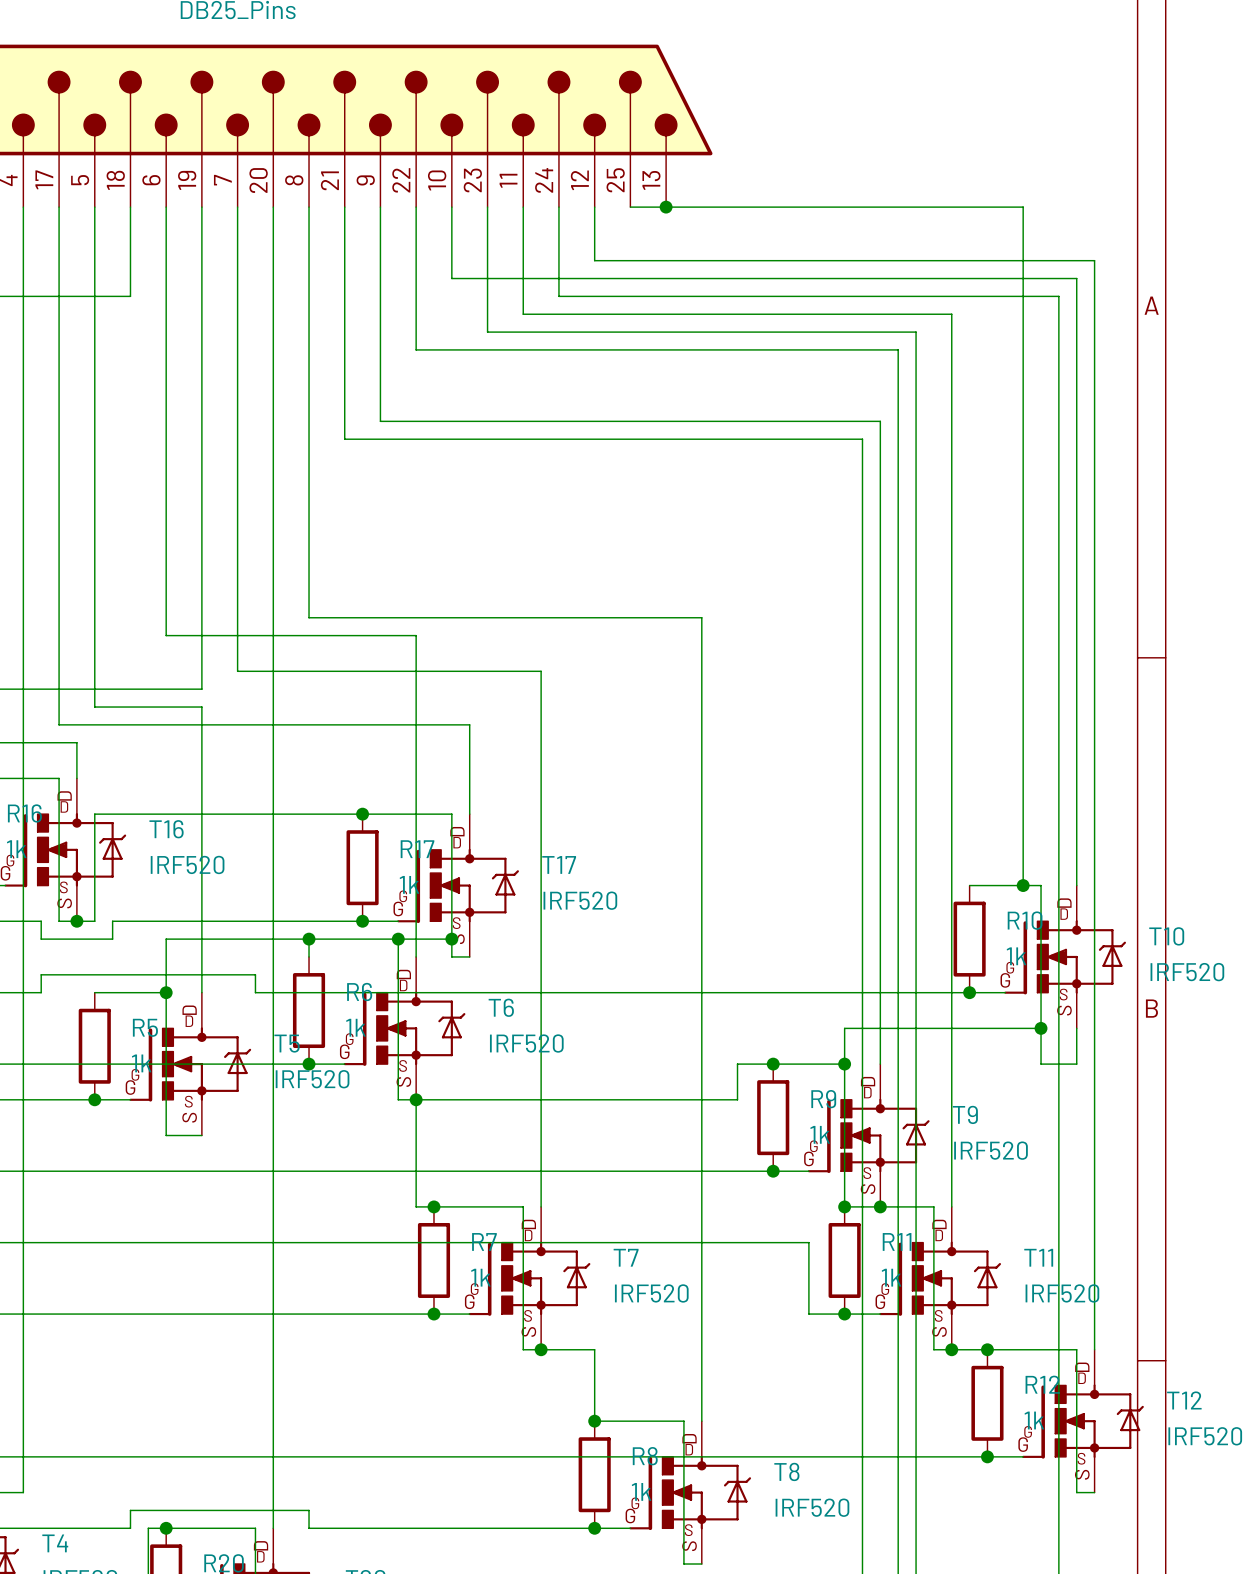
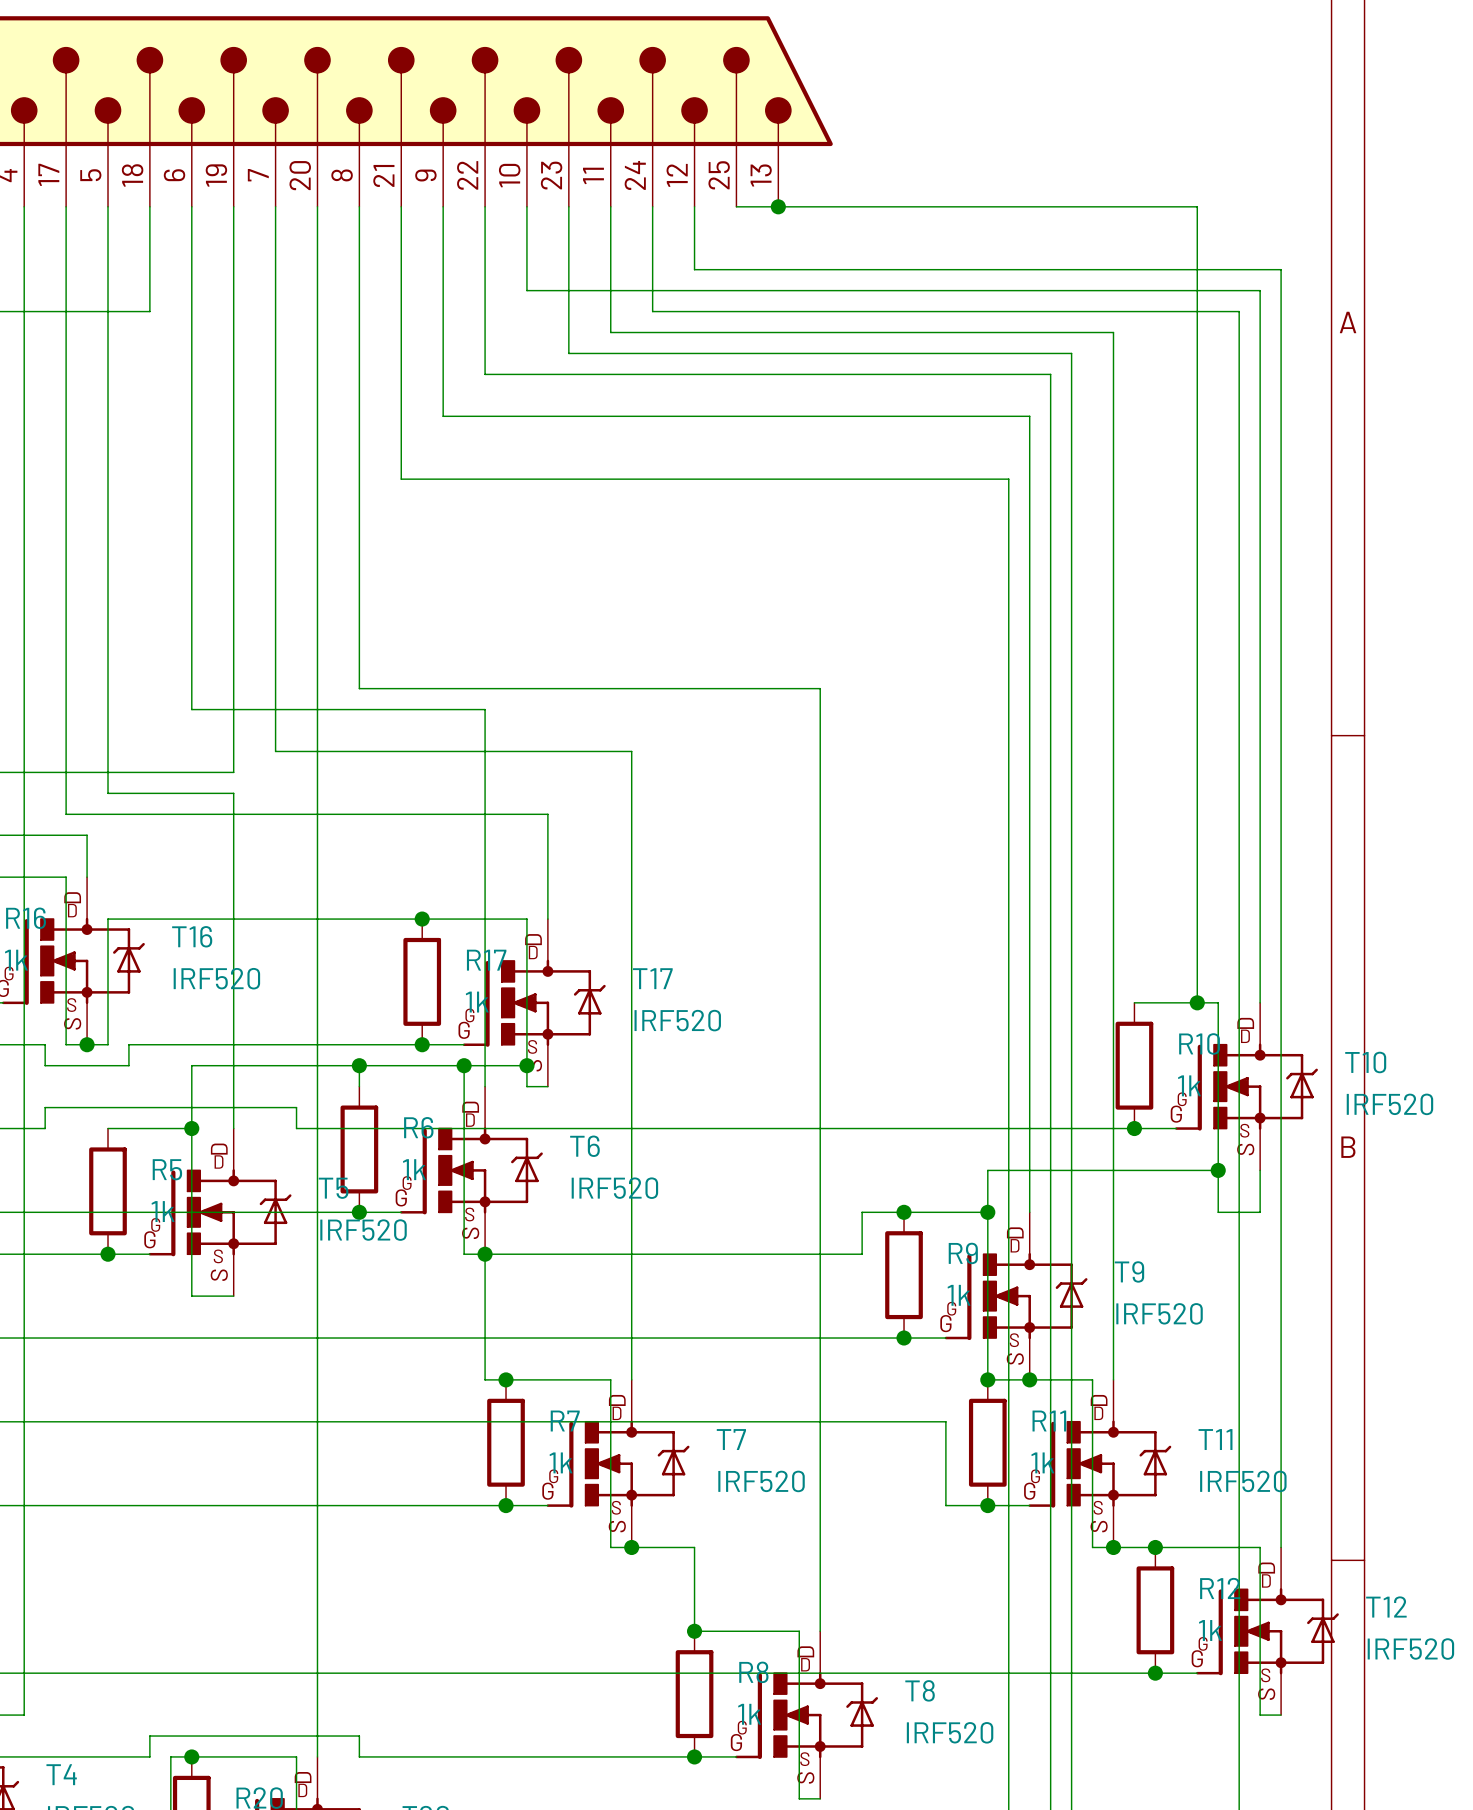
wire: (380, 385) (380, 421) (880, 421) -> (443, 416) (1029, 416) (1029, 458)

